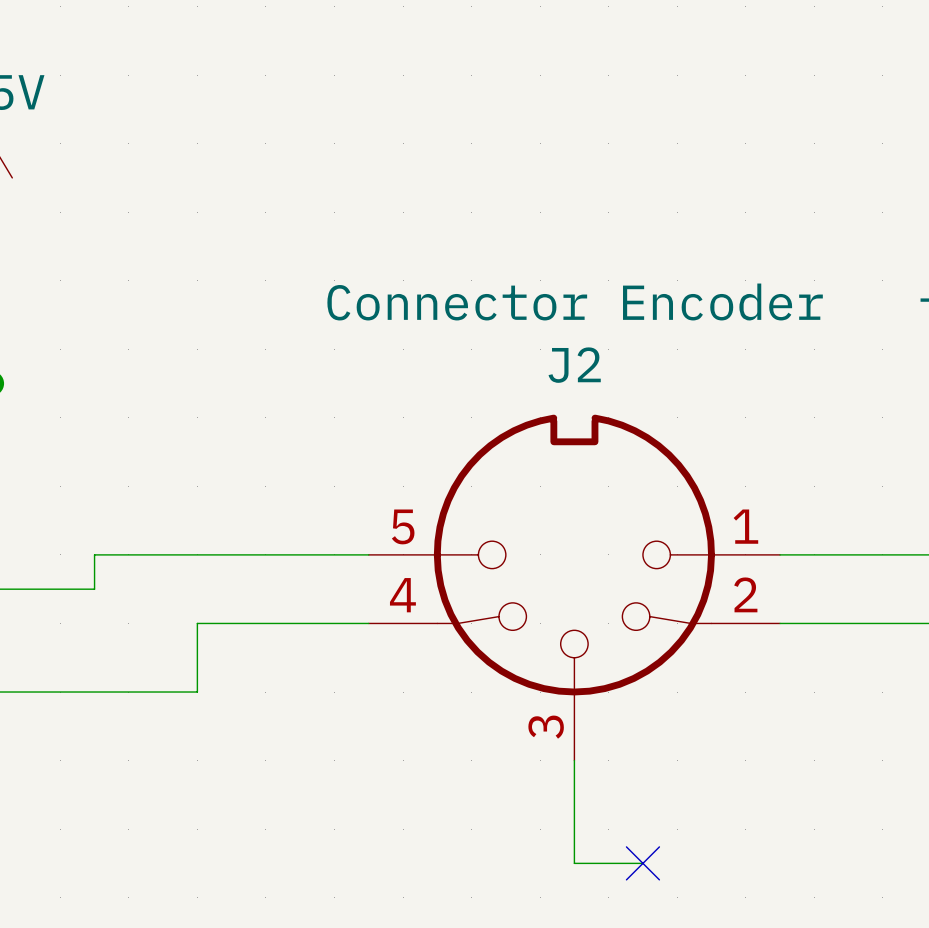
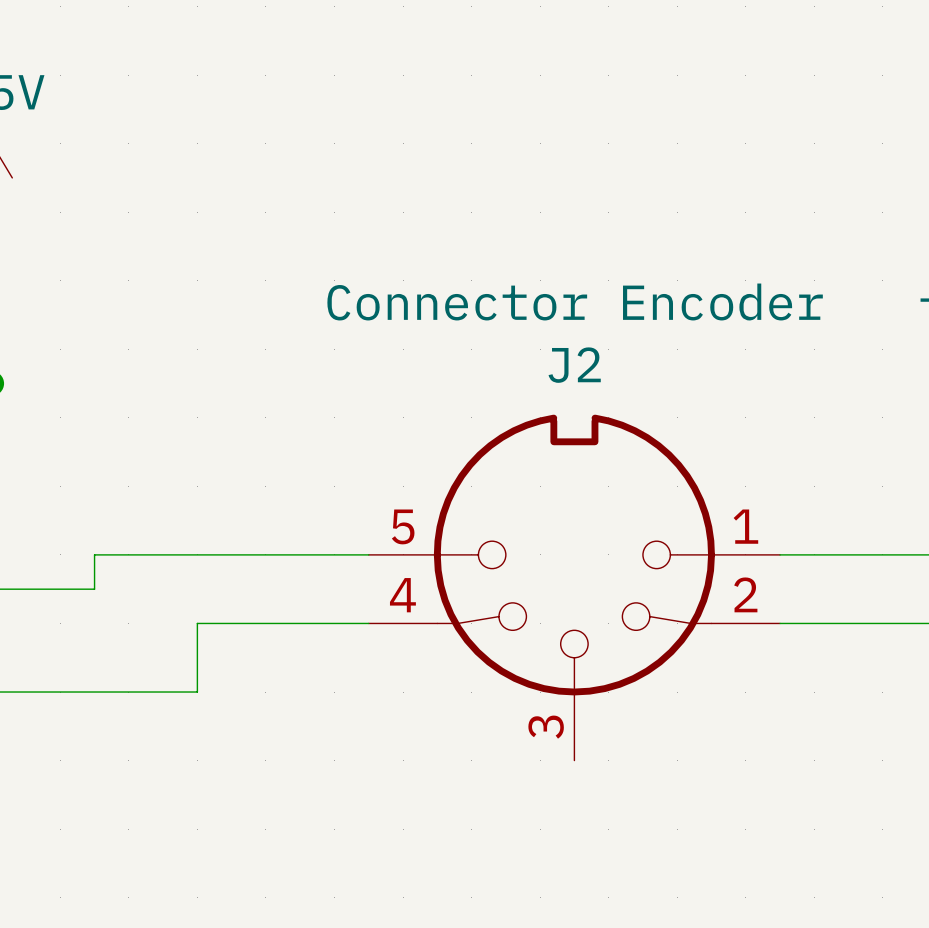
wire: (574, 760) (574, 863) (642, 863) -> none
no-connect mark: (642, 863) -> none

